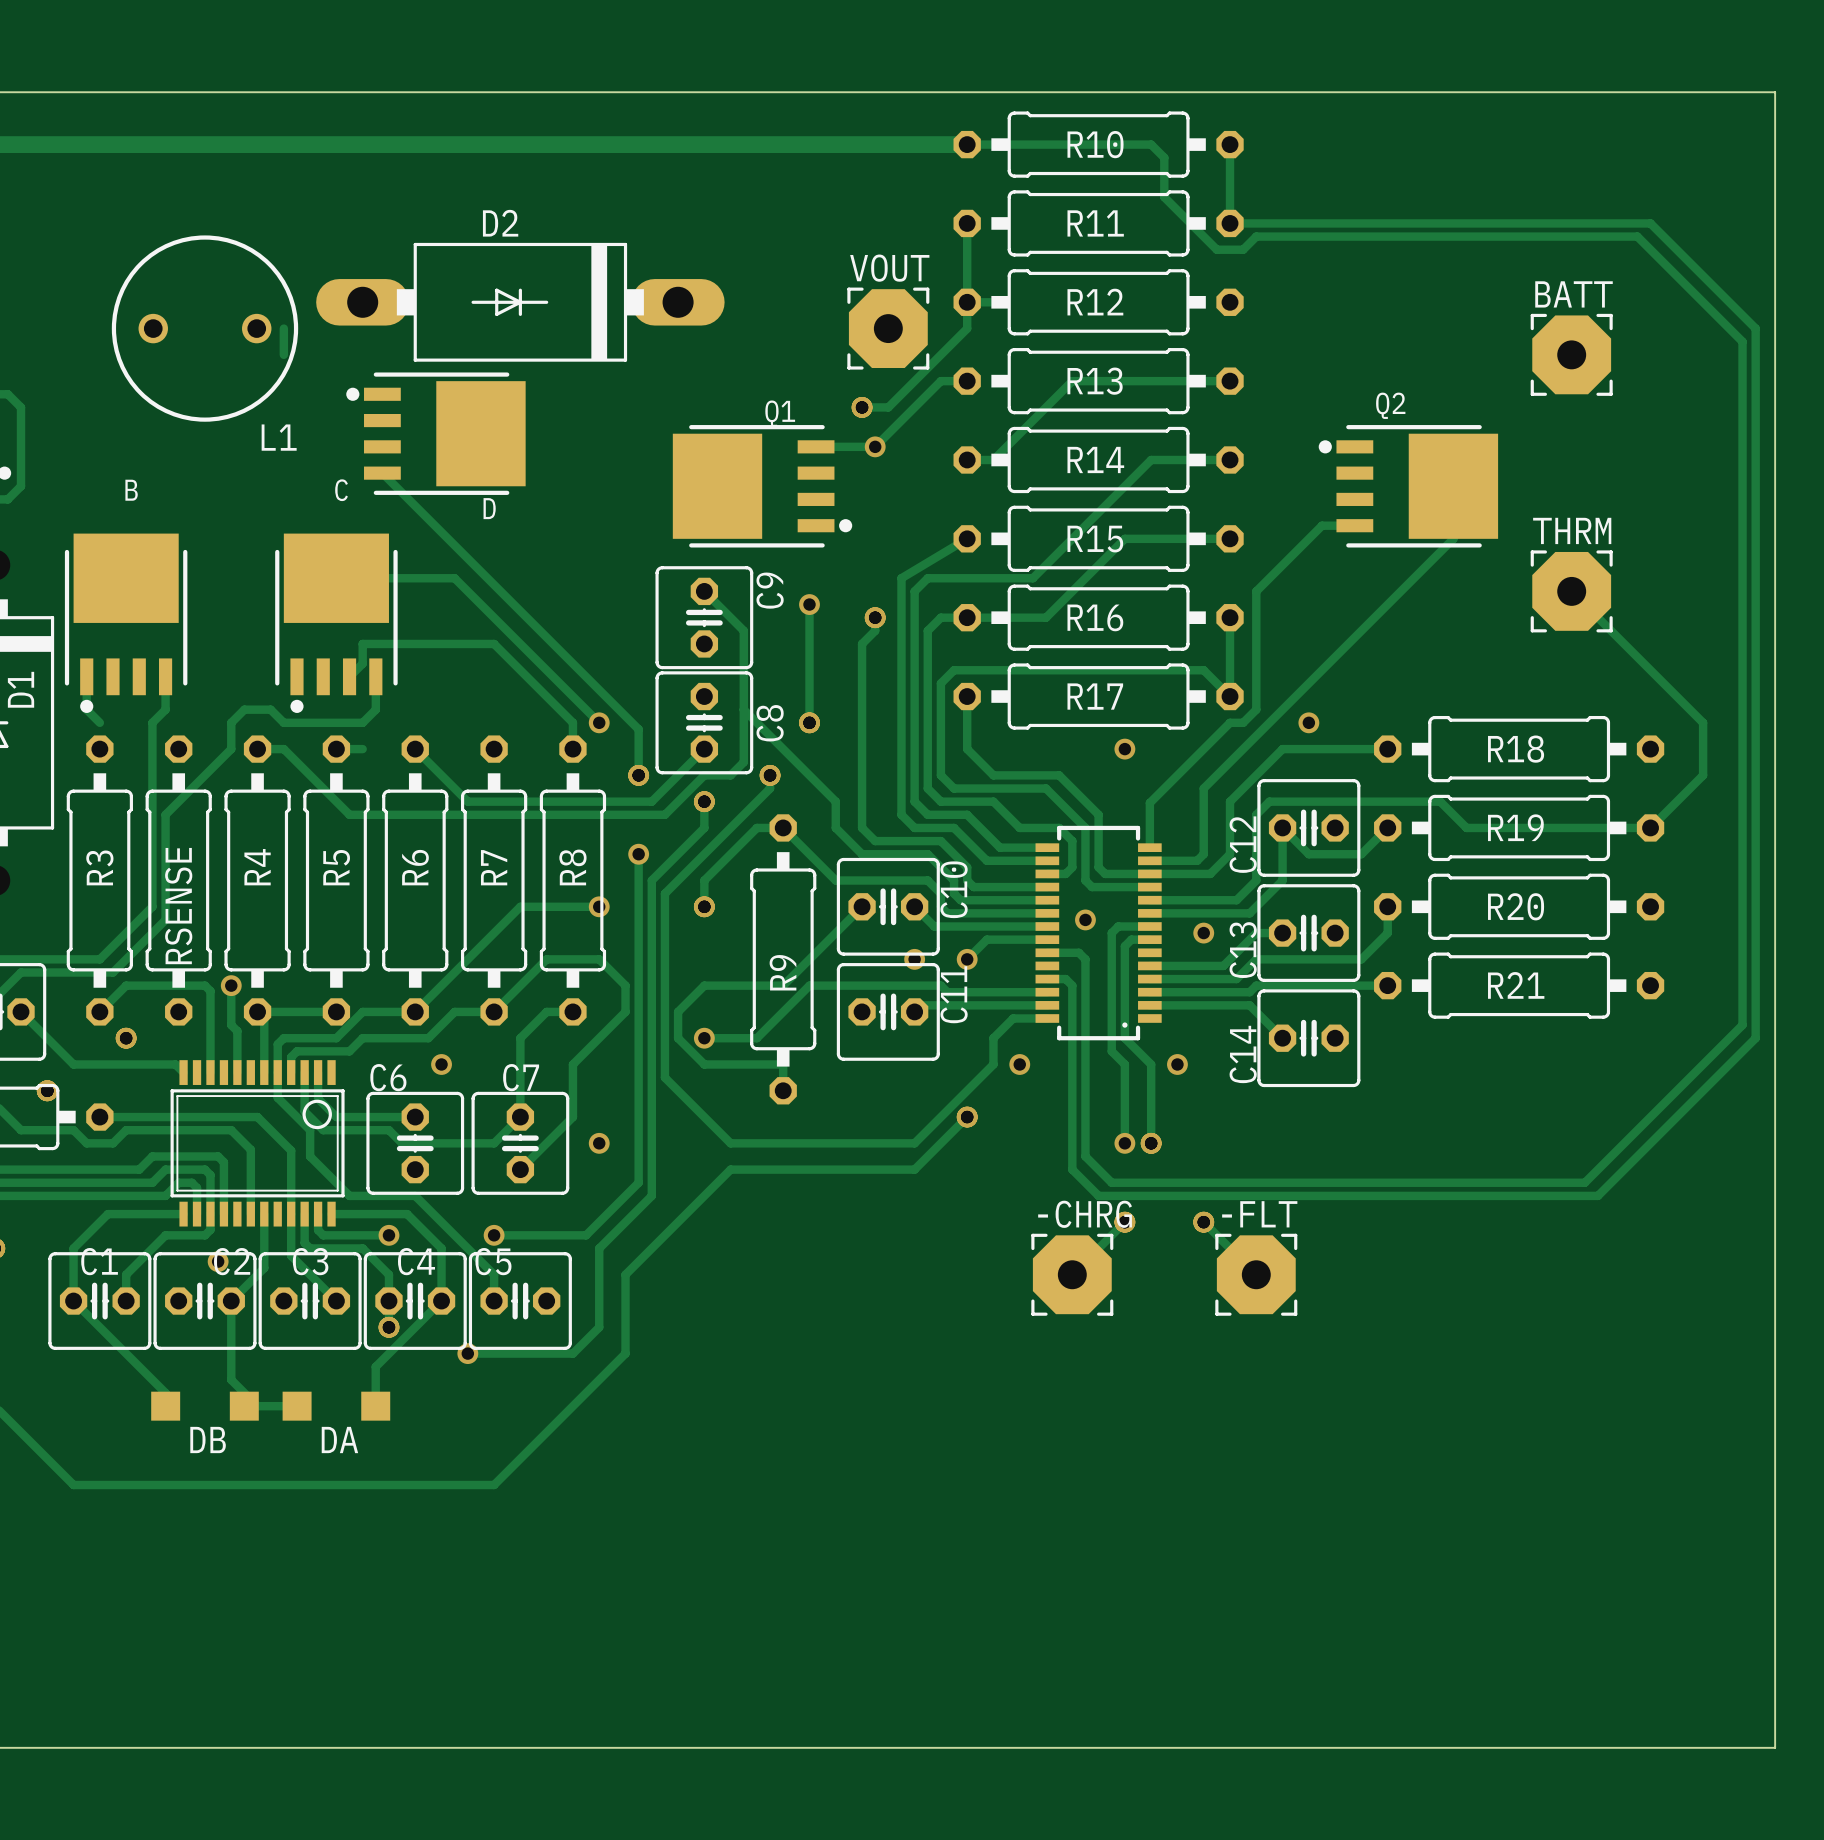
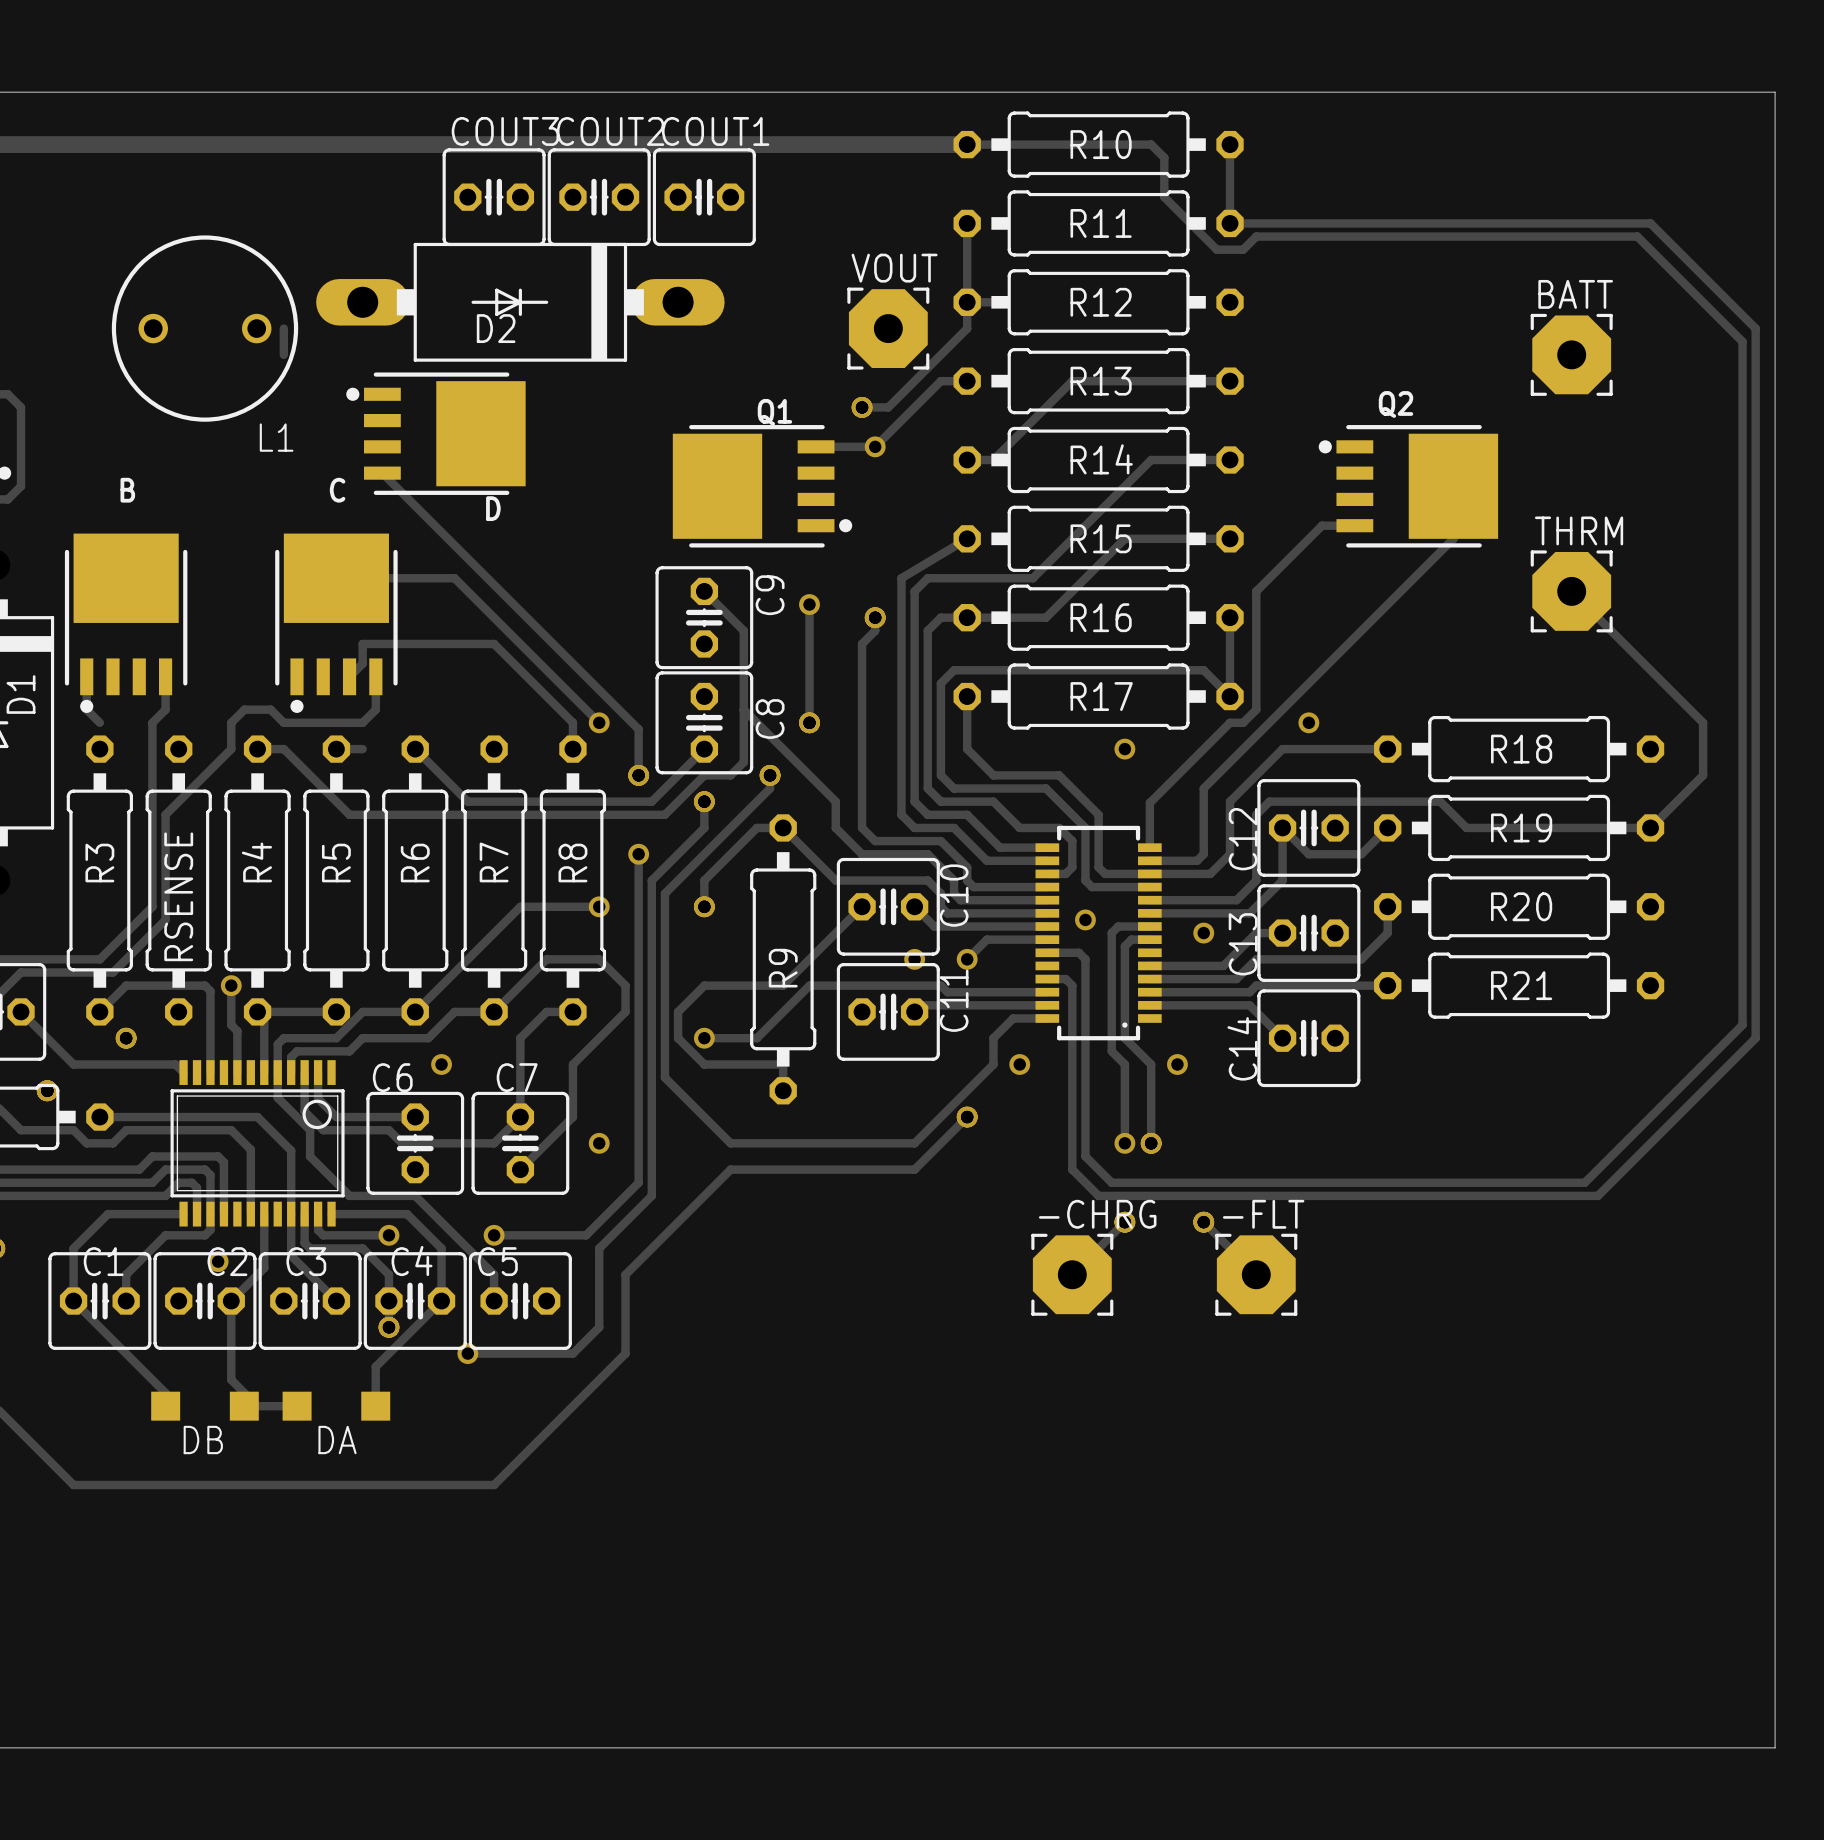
COUT3: none -> (494, 197)
COUT2: none -> (599, 197)
COUT1: none -> (704, 197)
D2 name position: D2 (500, 223) -> D2 (496, 328)

